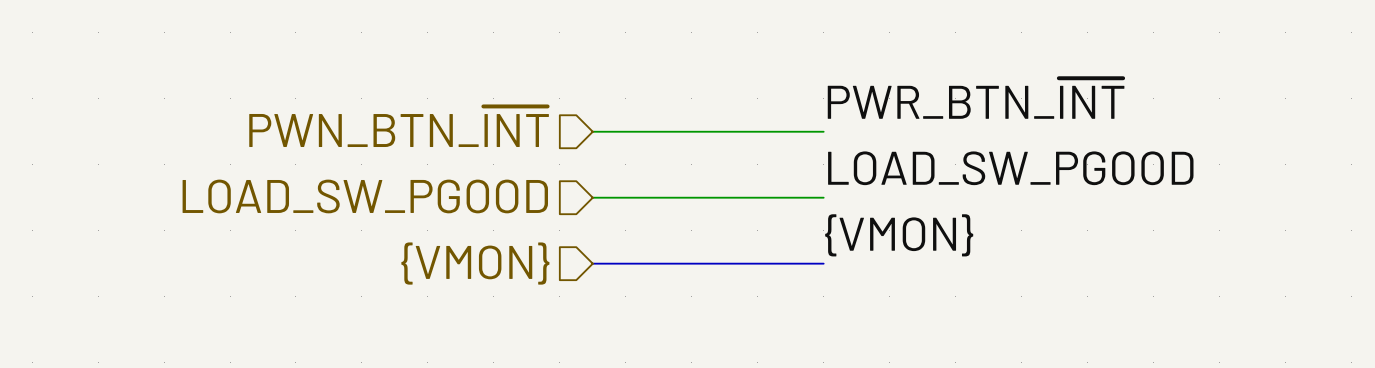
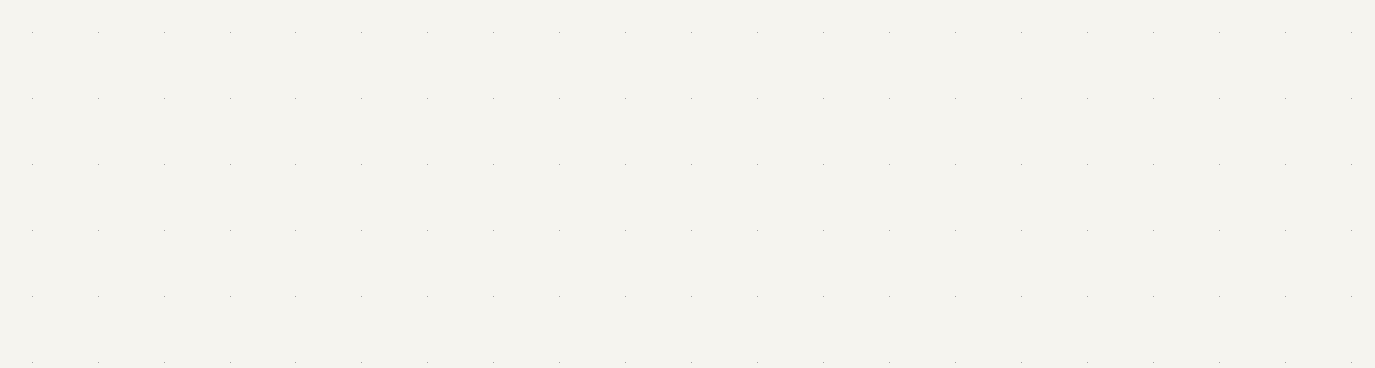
label: PWR_BTN_~{INT} (976, 98) -> none
hierarchical label: PWN_BTN_~{INT} (399, 126) -> none
wire: (592, 131) (823, 131) -> none
label: LOAD_SW_PGOOD (1010, 168) -> none
hierarchical label: LOAD_SW_PGOOD (365, 196) -> none
wire: (592, 197) (823, 197) -> none
label: {VMON} (899, 235) -> none
hierarchical label: {VMON} (475, 263) -> none
bus: (592, 263) (823, 263) -> none

